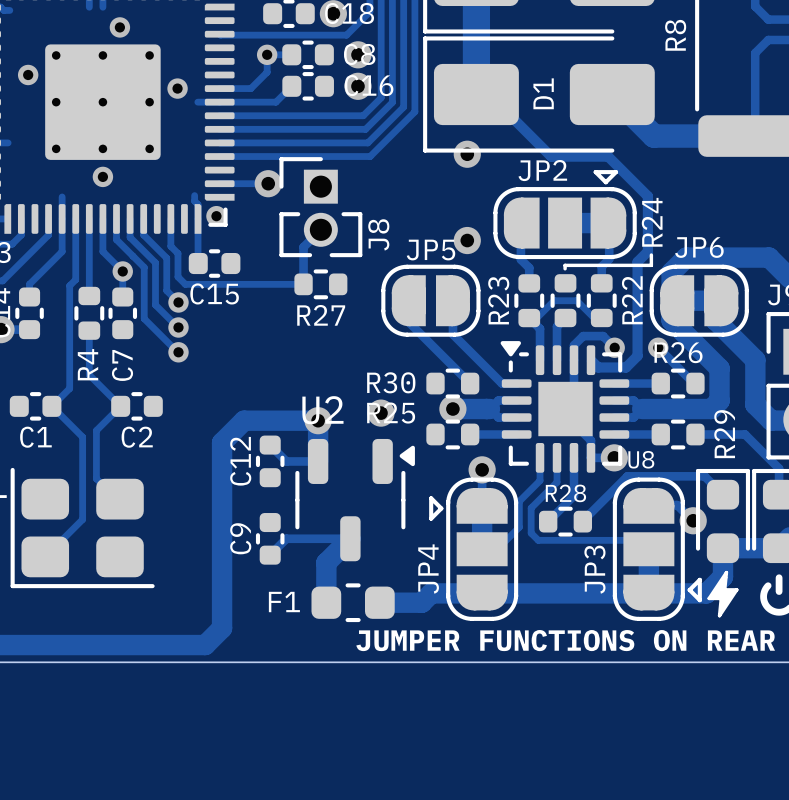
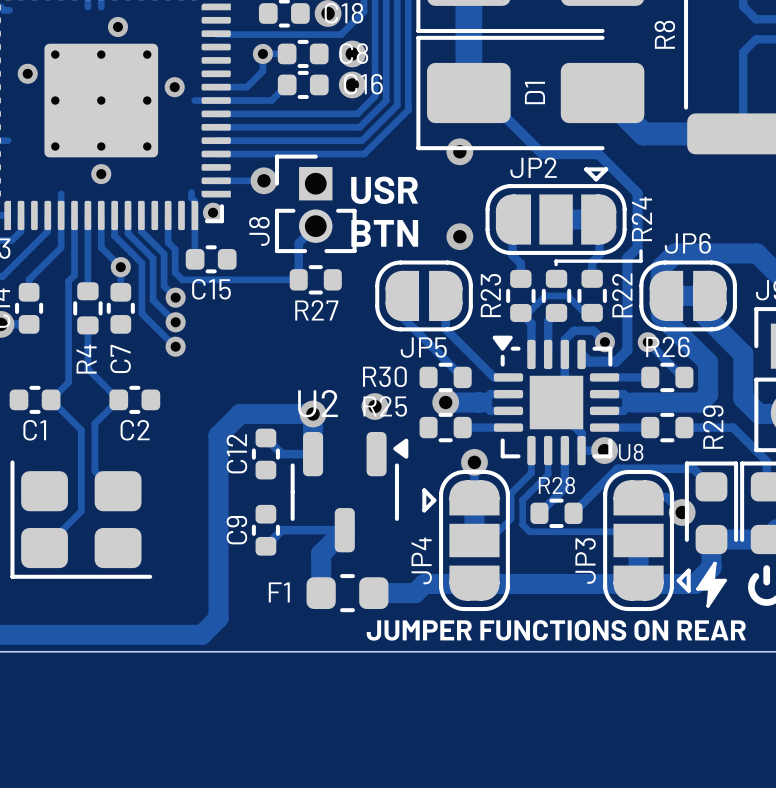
text: none -> USR (384, 190)
J8 name position: J8 (378, 234) -> J8 (259, 231)
text: none -> BTN (384, 233)
JP5 name position: JP5 (431, 250) -> JP5 (423, 347)

